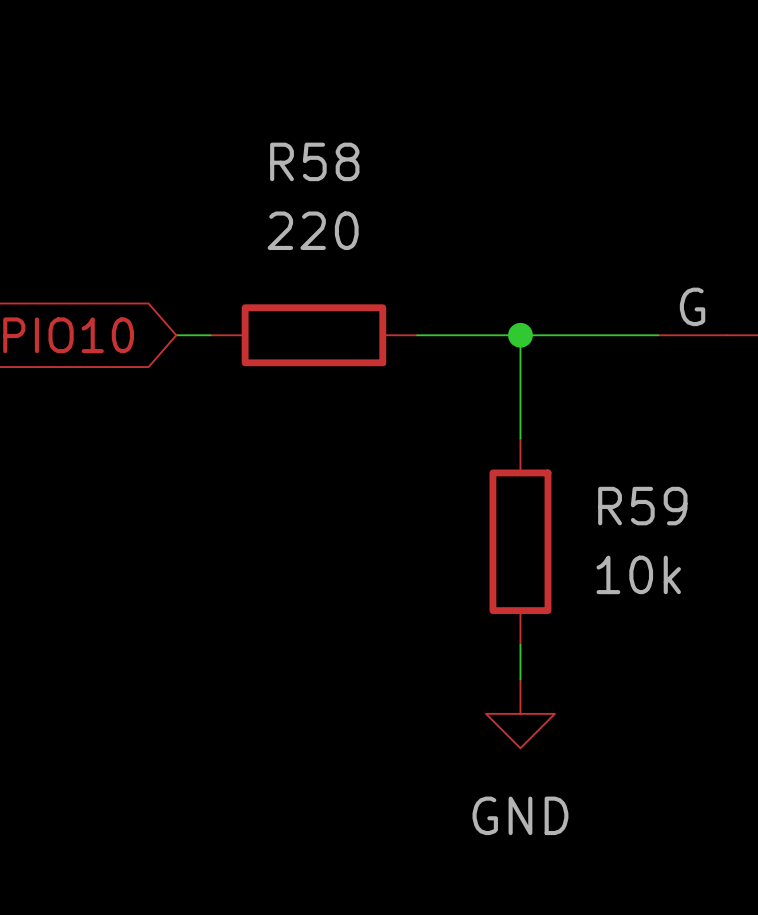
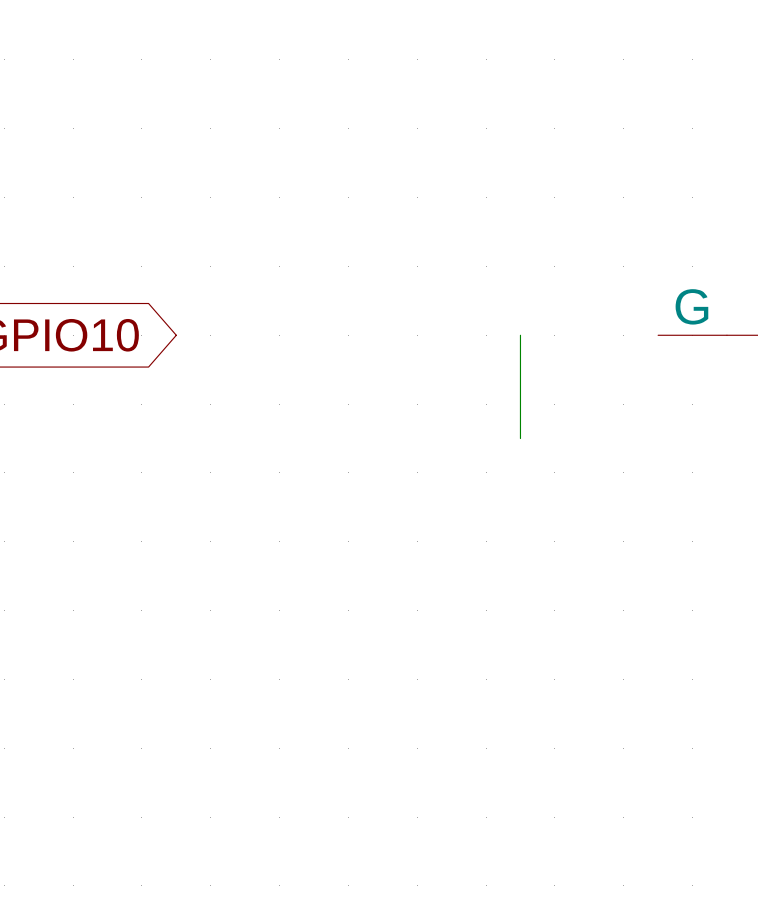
wire: (176, 335) (210, 335) -> none
R58: 220 (313, 335) -> none
wire: (417, 335) (658, 335) -> none
junction: (520, 335) -> none
R59: 10k (520, 541) -> none
wire: (520, 645) (520, 679) -> none
power symbol: GND (520, 713) -> none

